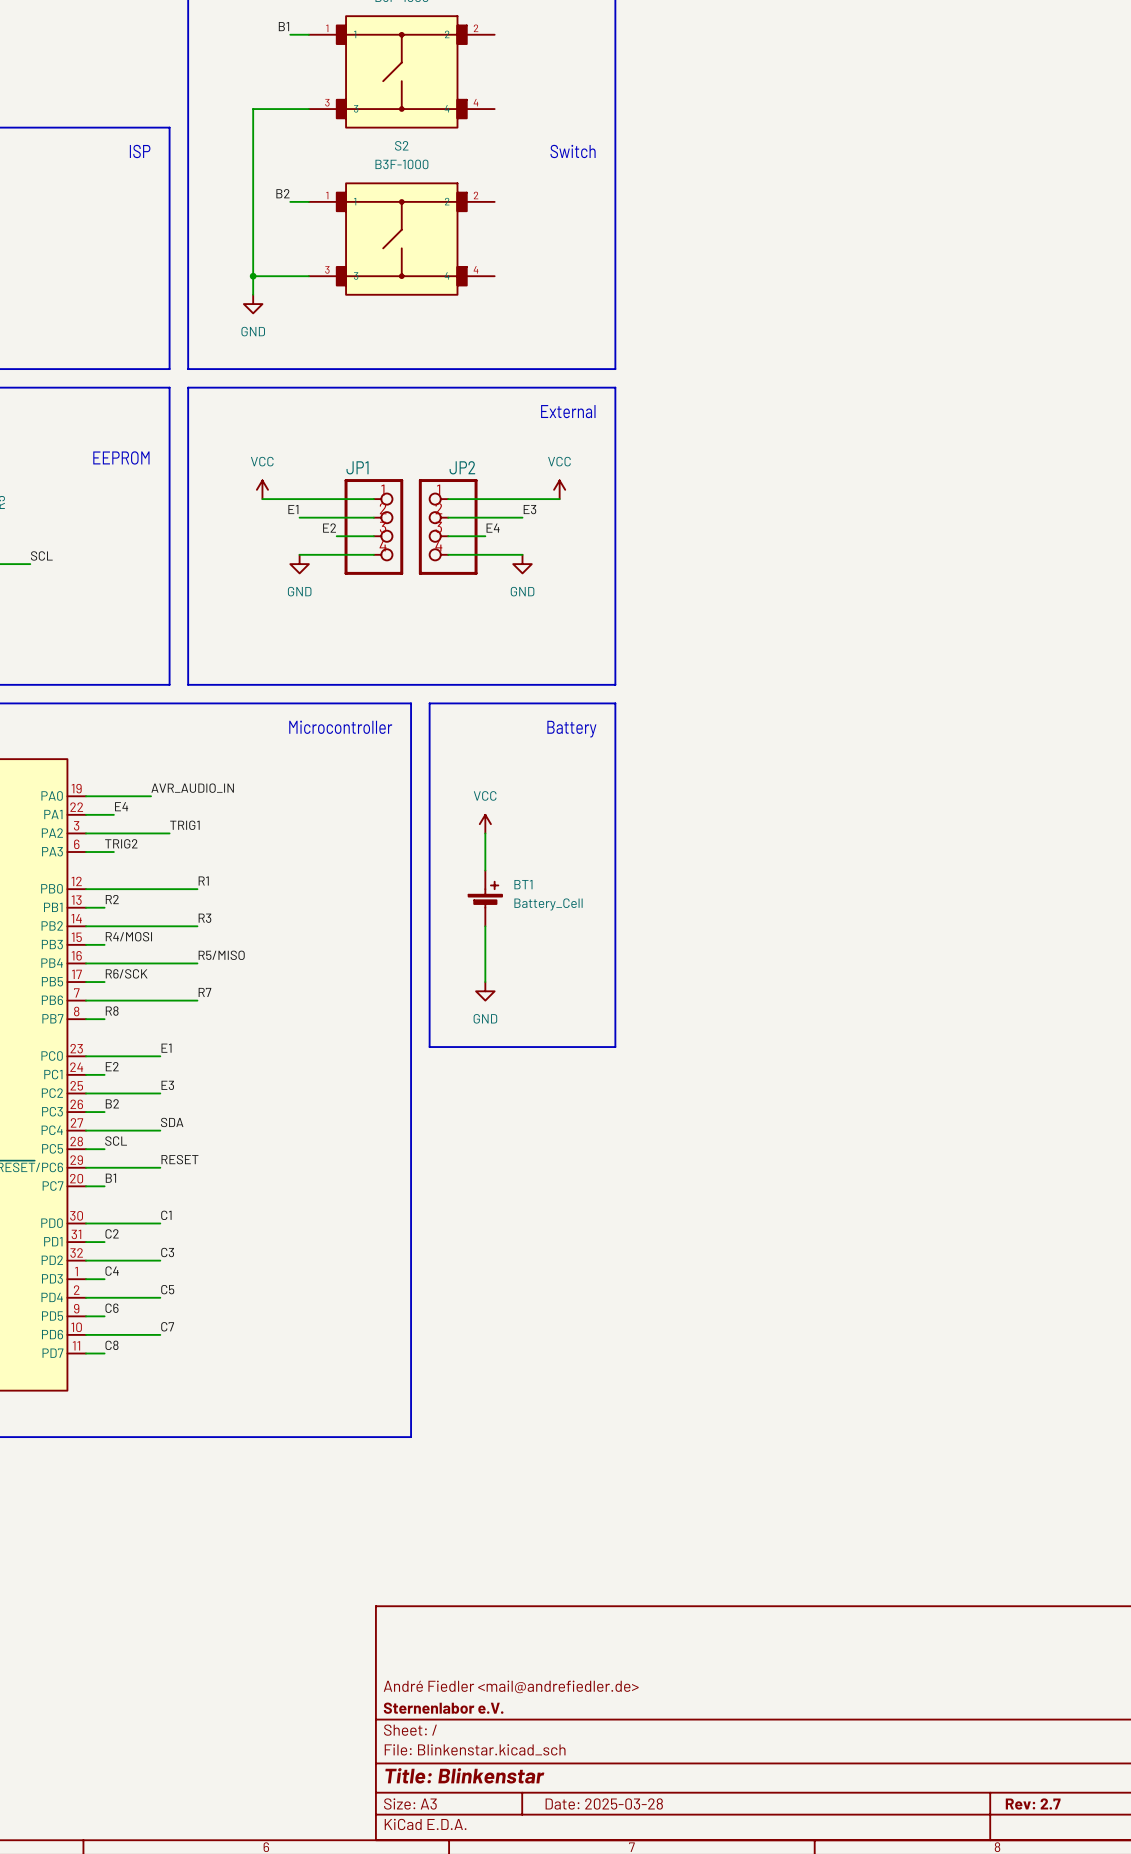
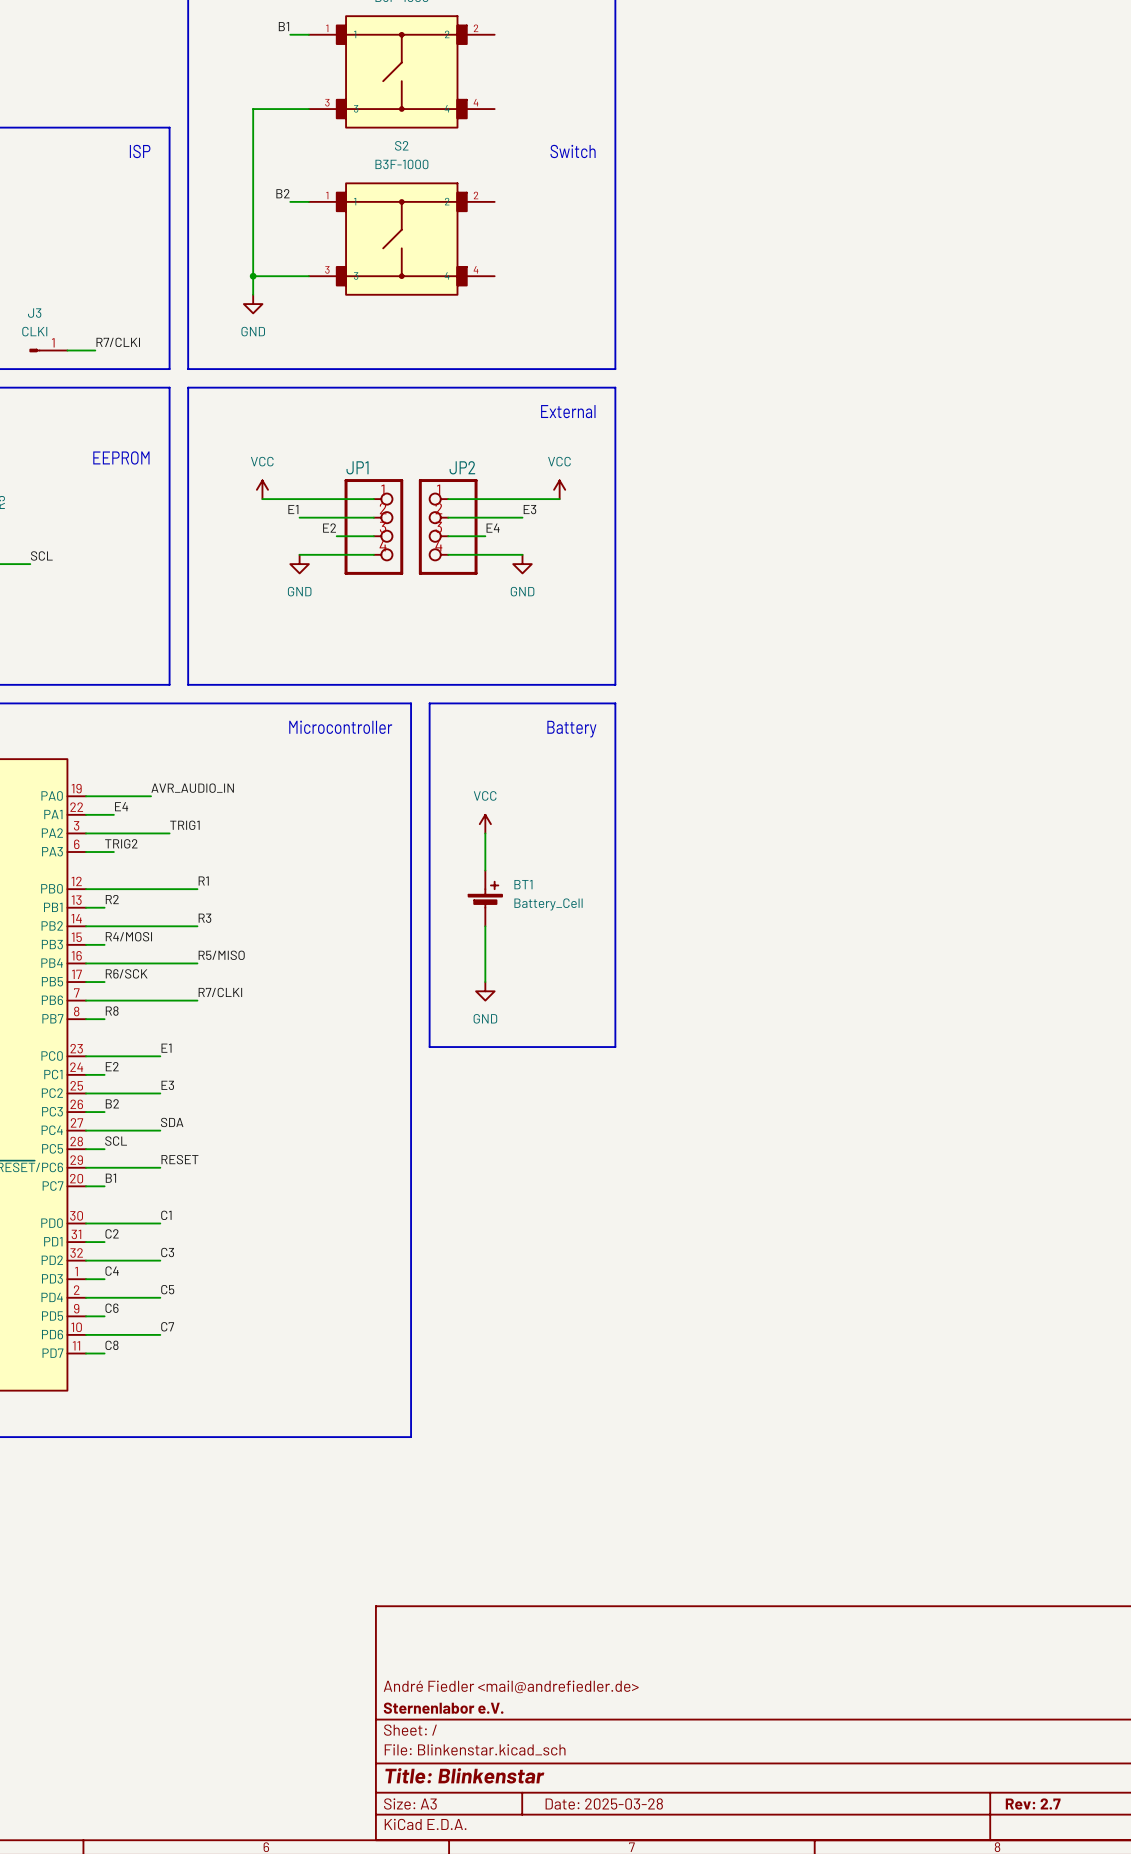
label: none -> R7/CLKI (118, 342)
J3: none -> CLKI (48, 350)
wire: none -> (67, 350) (95, 350)
label: R7 (204, 992) -> R7/CLKI (220, 992)

